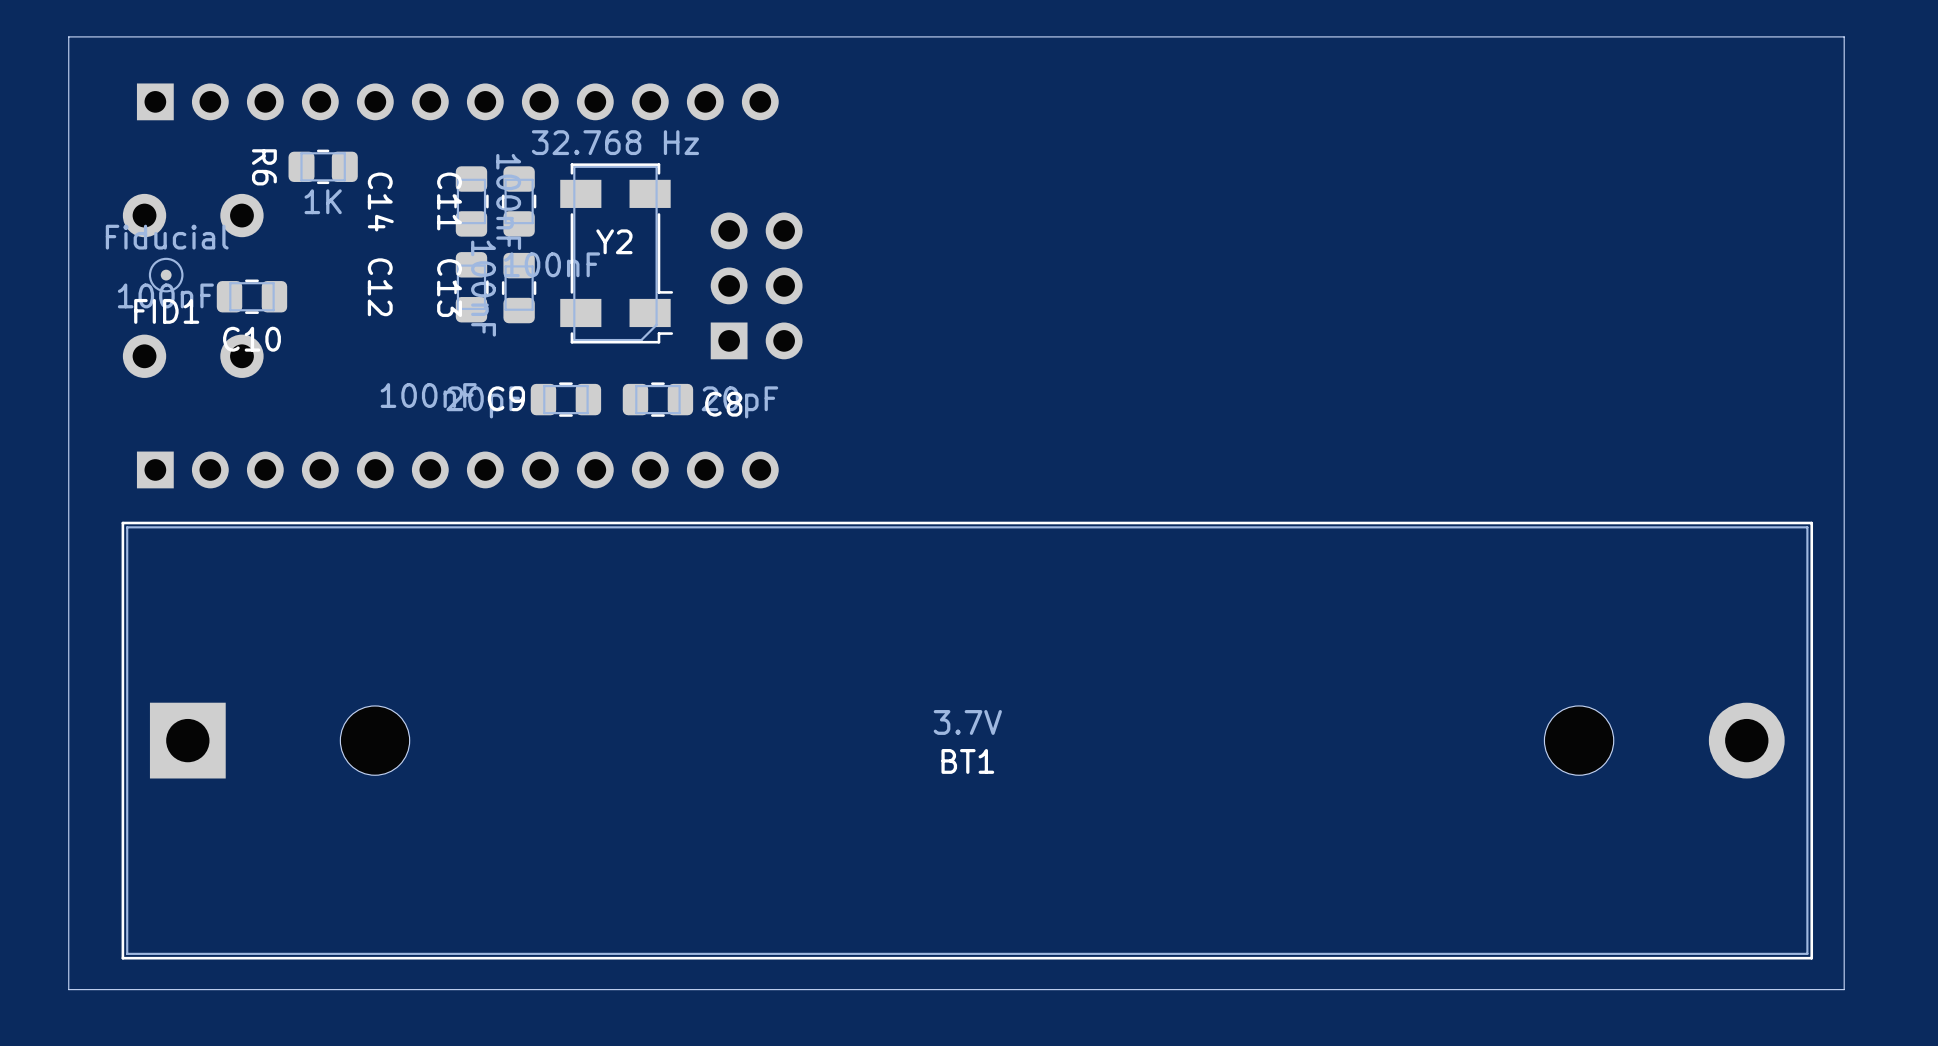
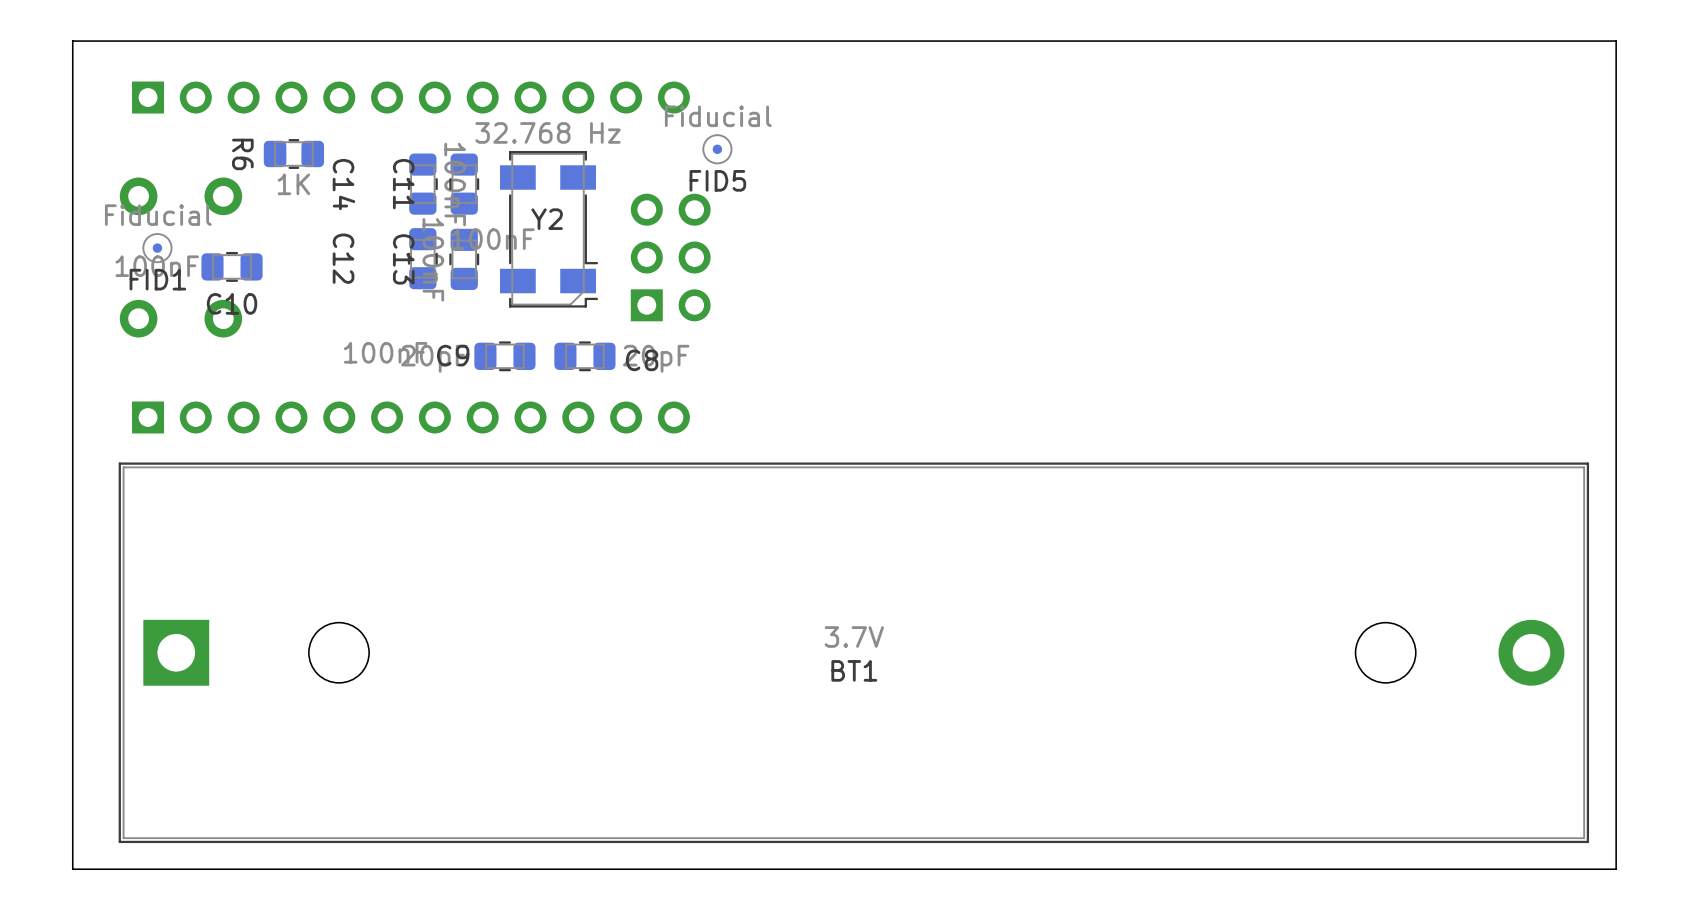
FID5: none -> Fiducial (717, 149)

